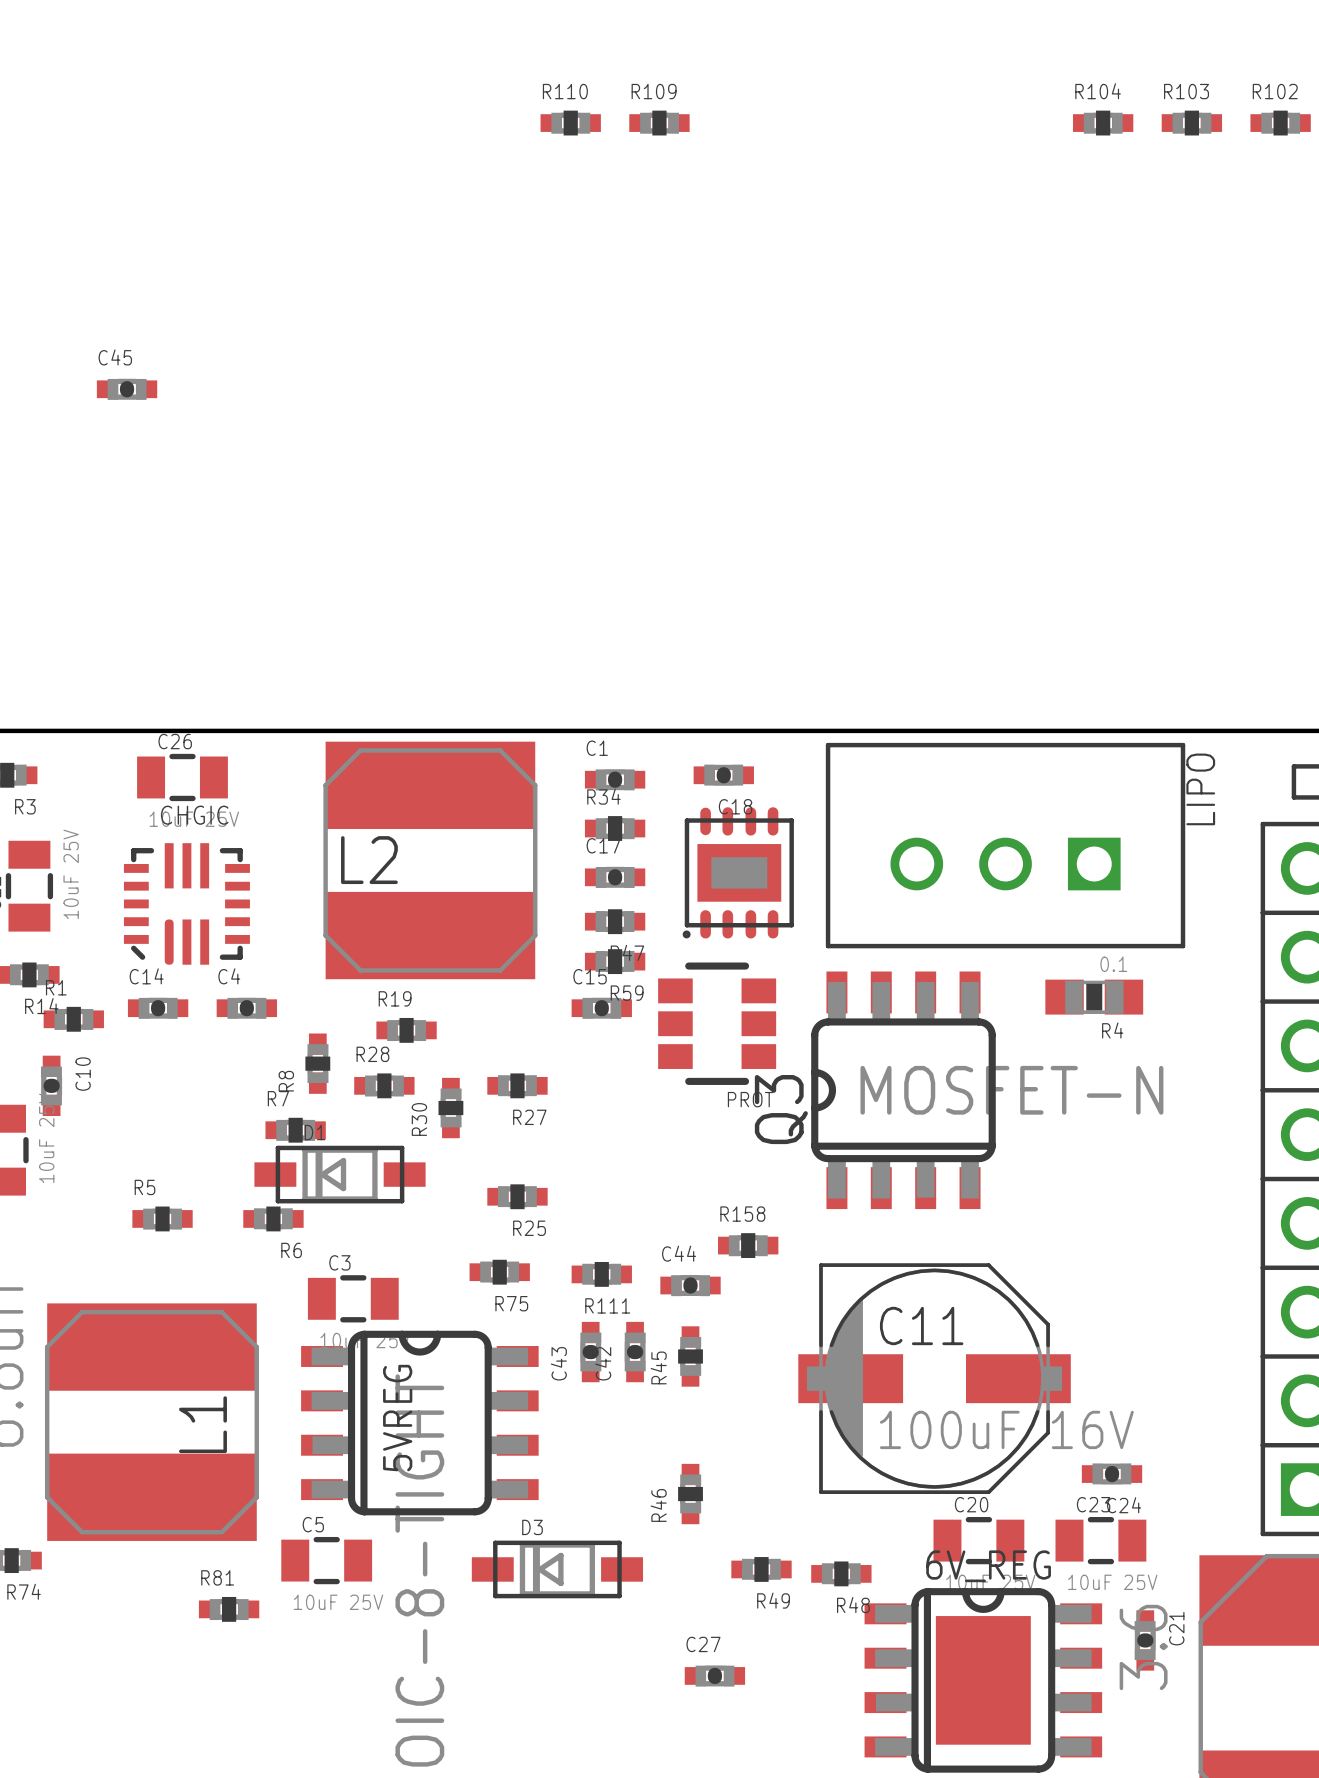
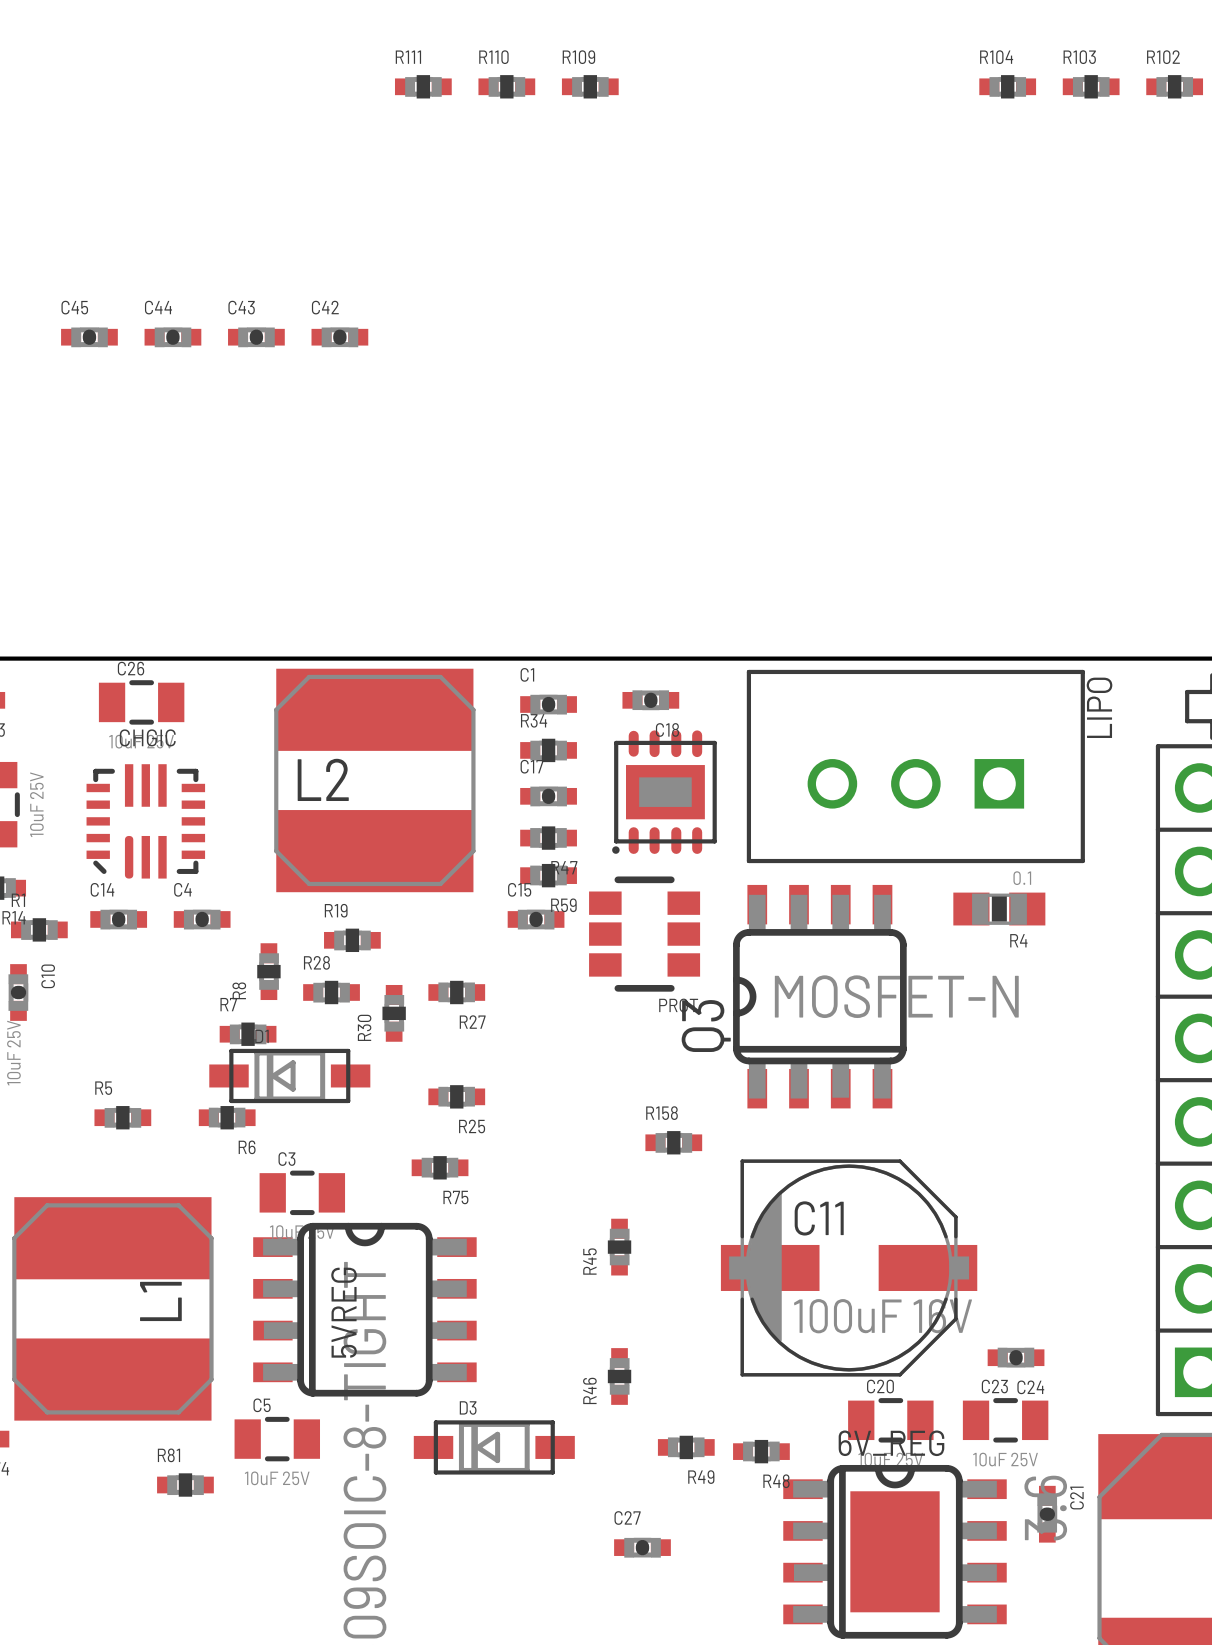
R111 position: (601, 1274) -> (423, 86)
C44 position: (690, 1285) -> (172, 337)
R111 name position: R111 (607, 1305) -> R111 (408, 57)
C43 rotation: 0° (590, 1352) -> 90° clockwise (256, 337)
C43 position: (590, 1352) -> (256, 337)
C42 rotation: 0° (635, 1352) -> 90° clockwise (339, 337)
C42 position: (635, 1352) -> (339, 337)

